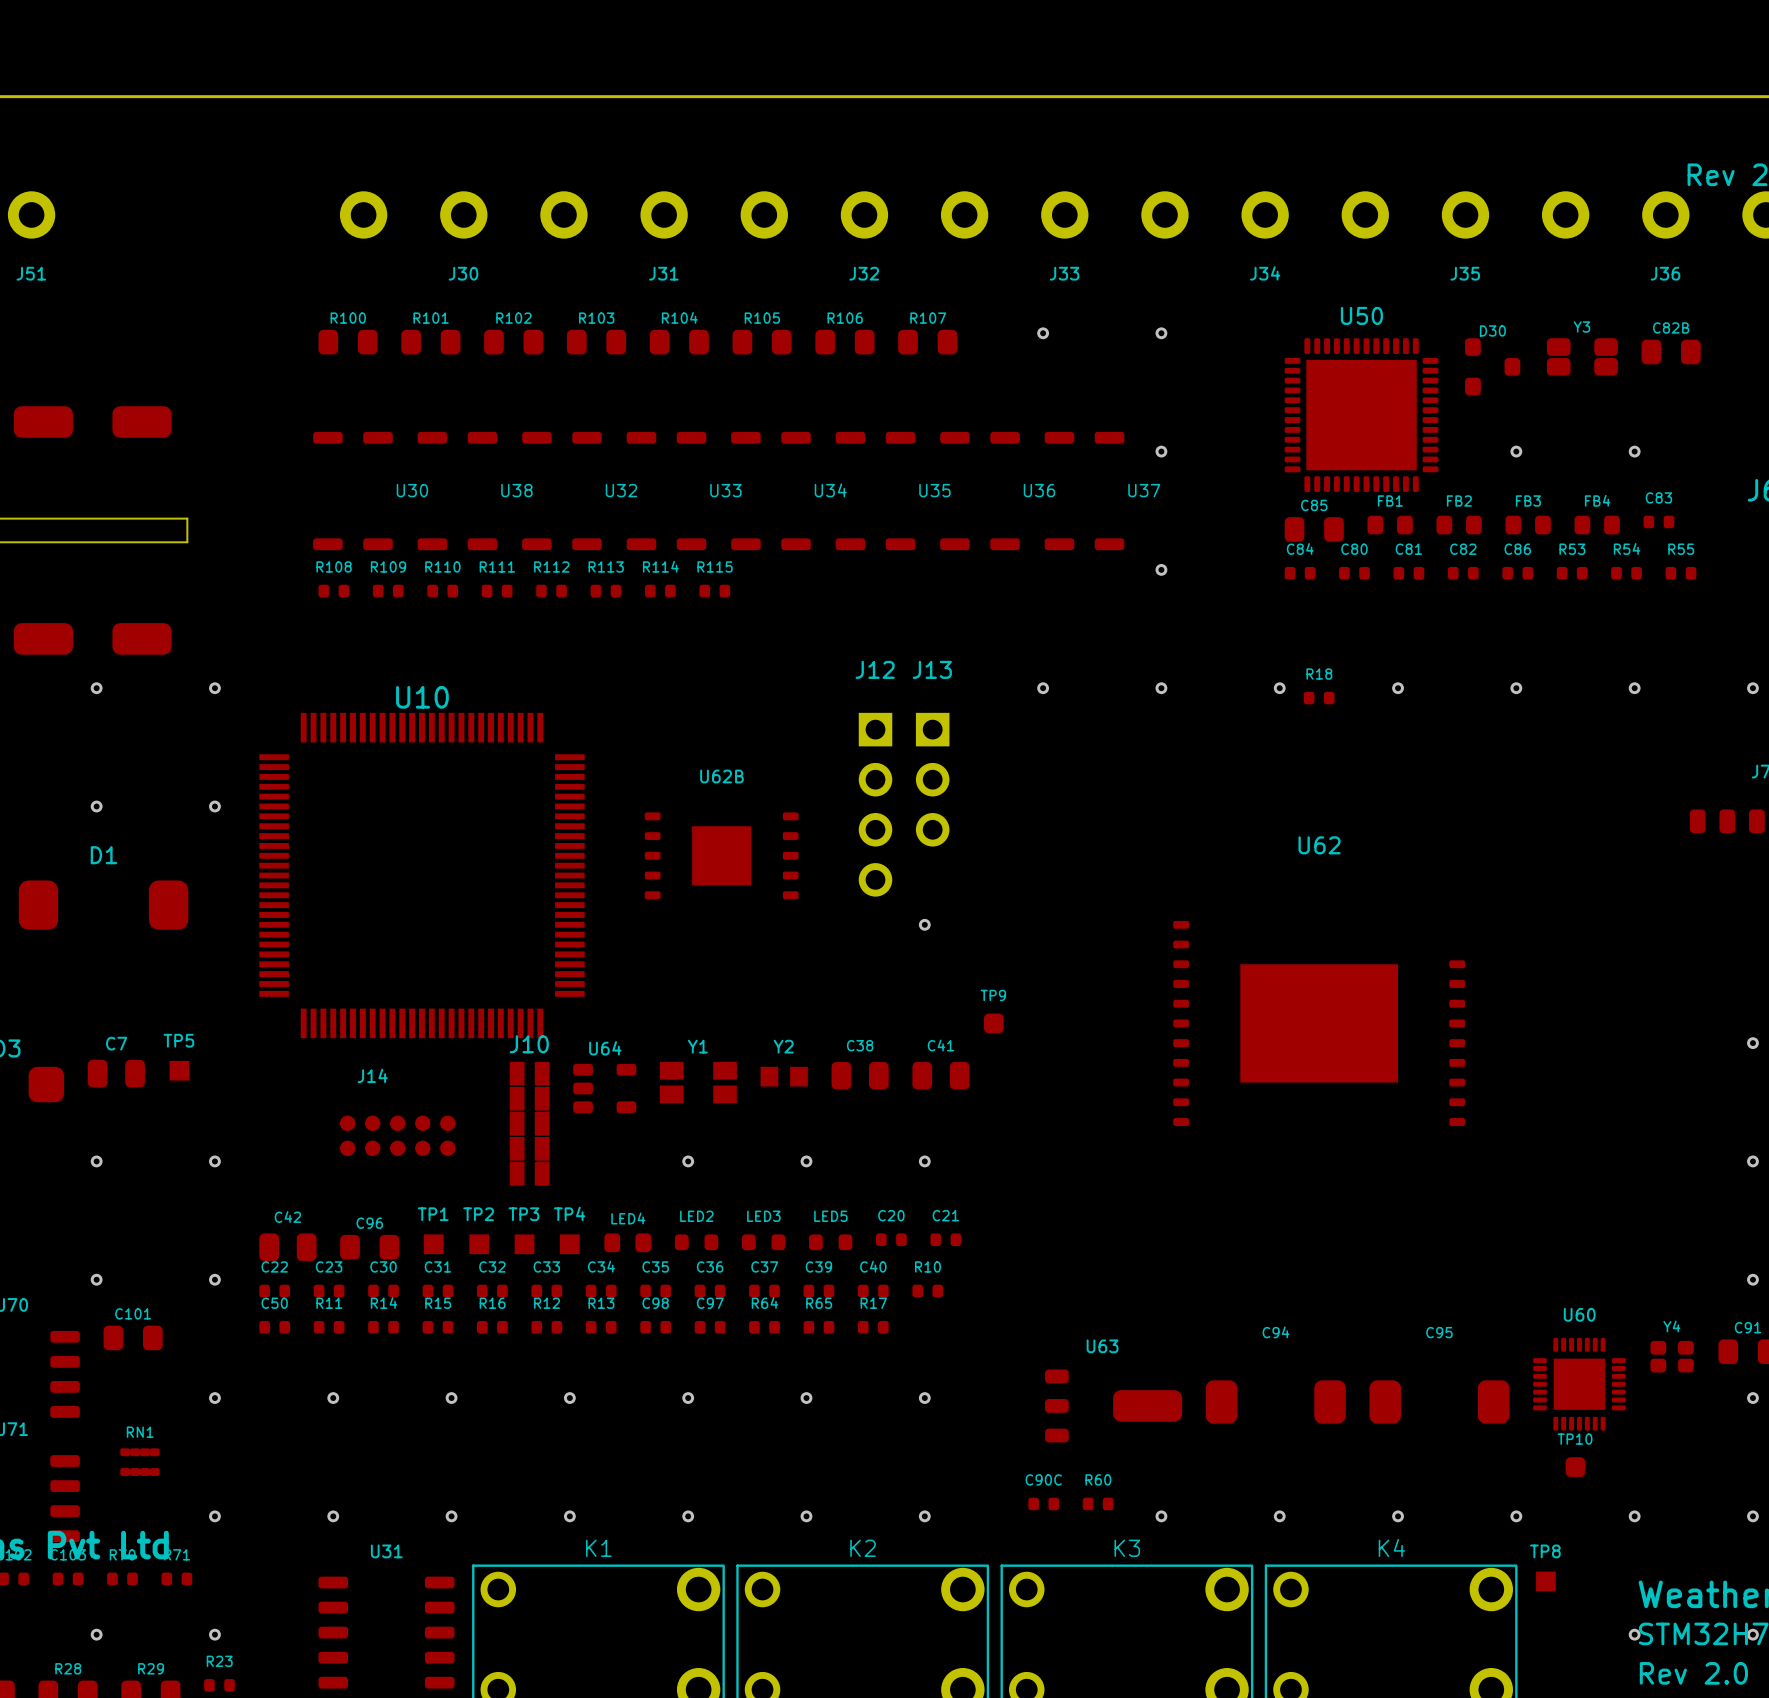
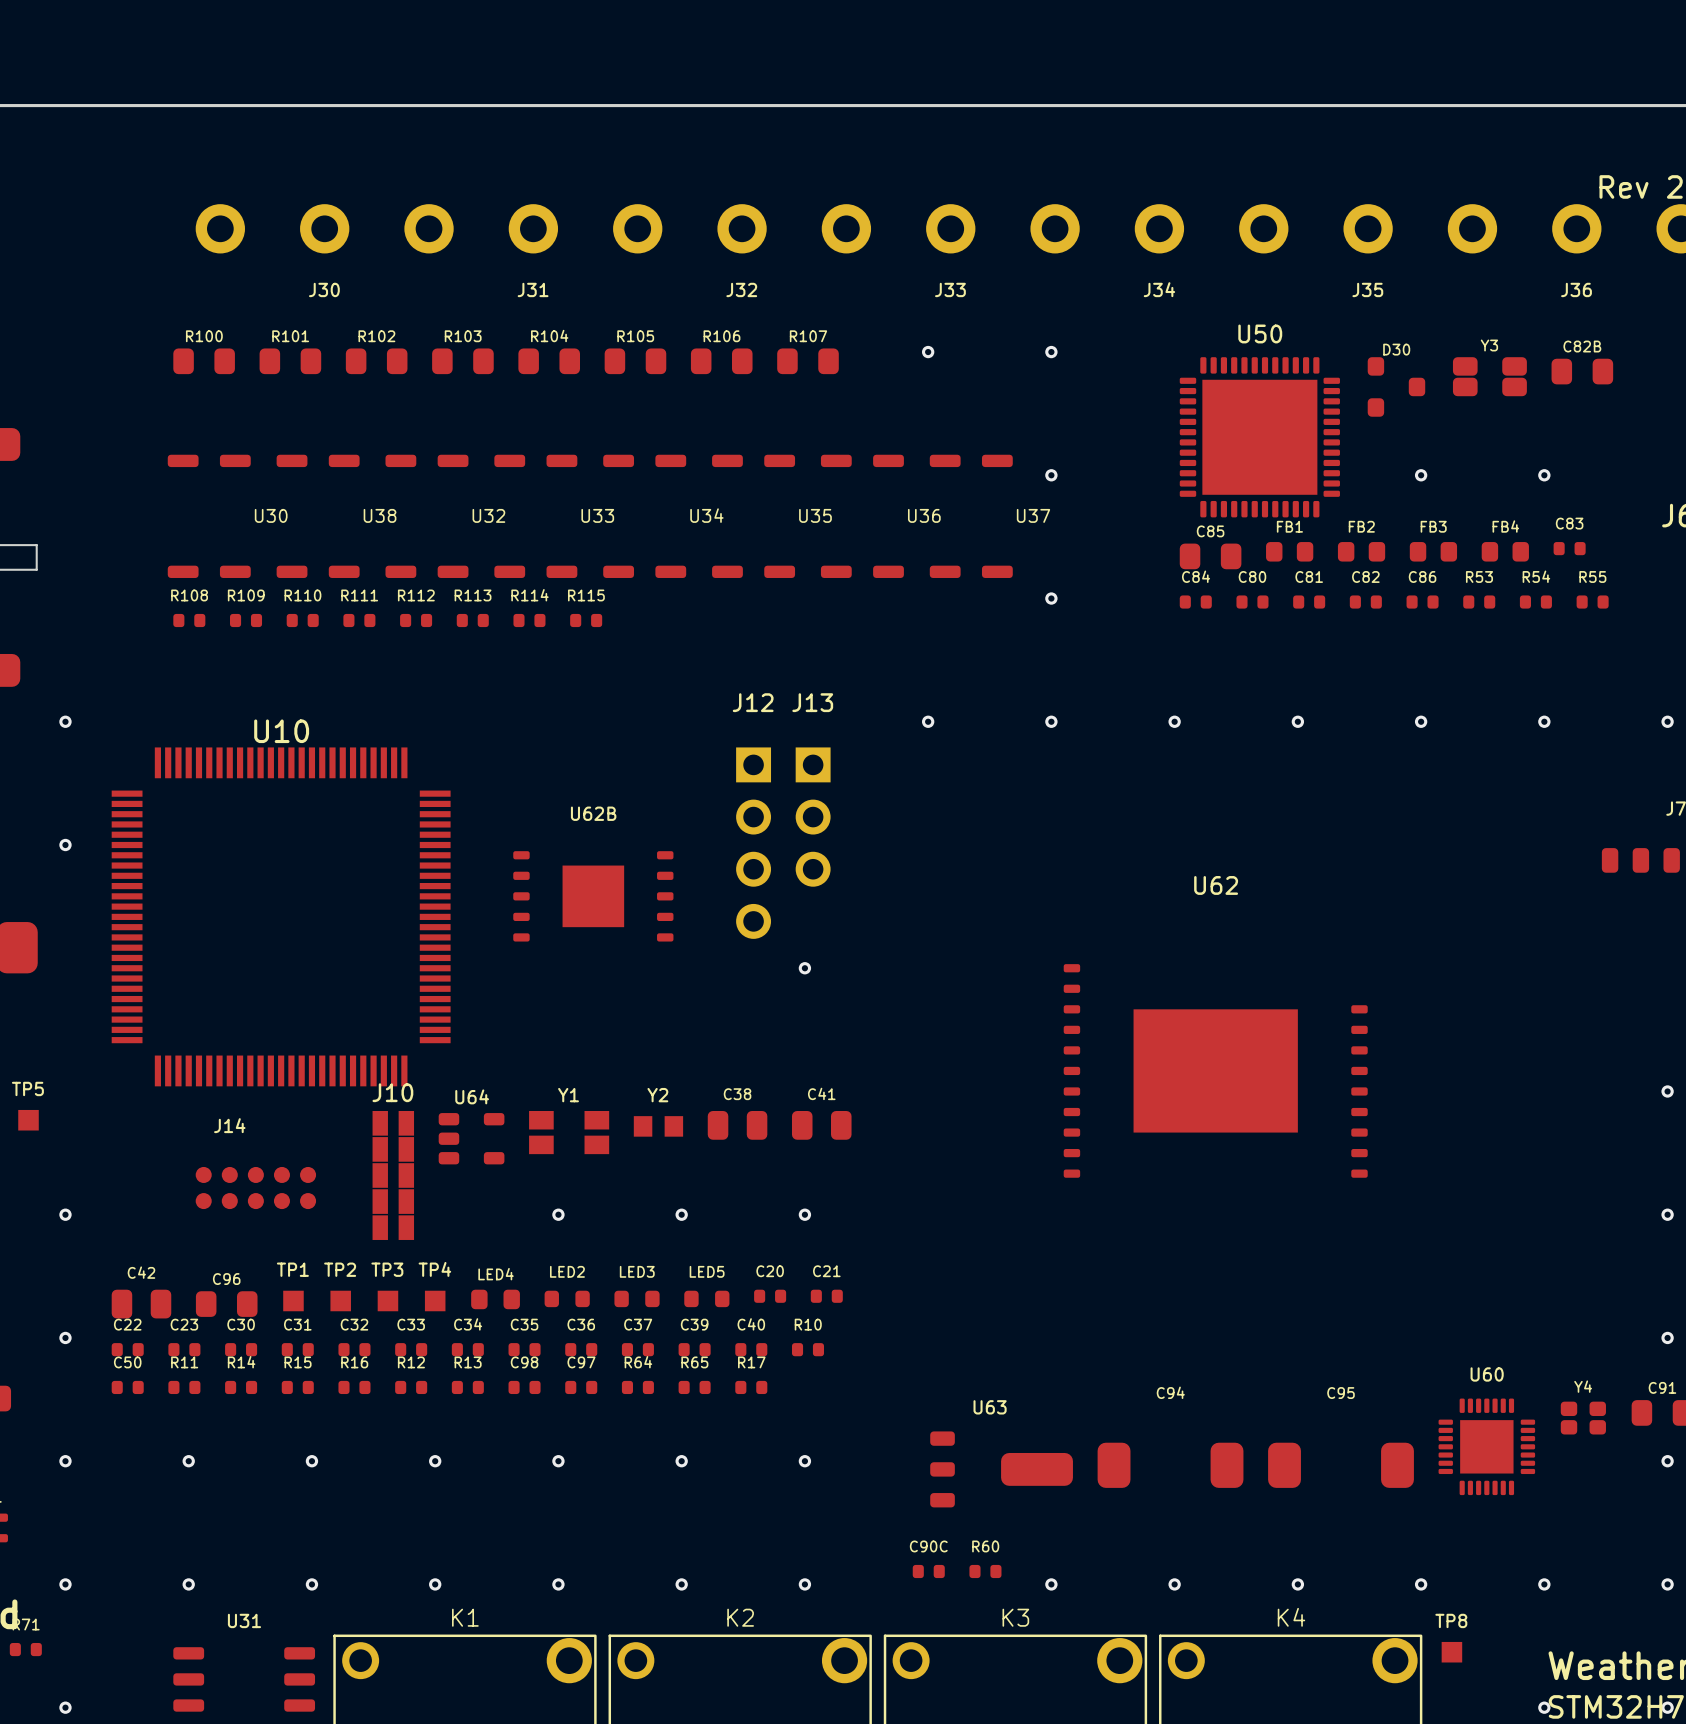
R18: (1319, 698) -> none
TP9: (993, 1023) -> none
TP10: (1575, 1467) -> none

